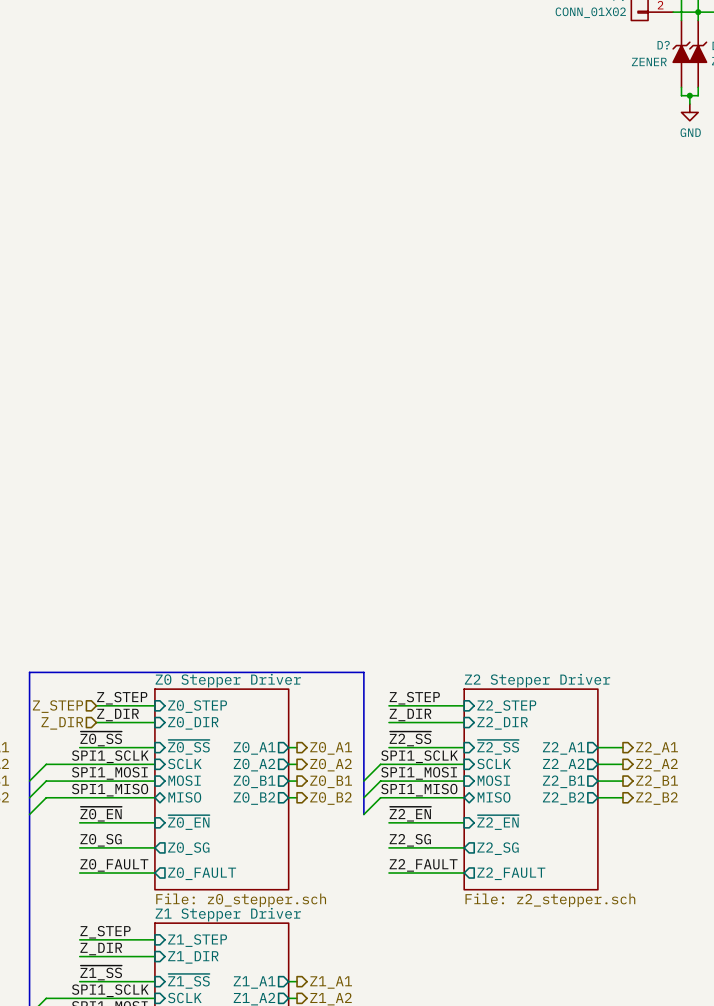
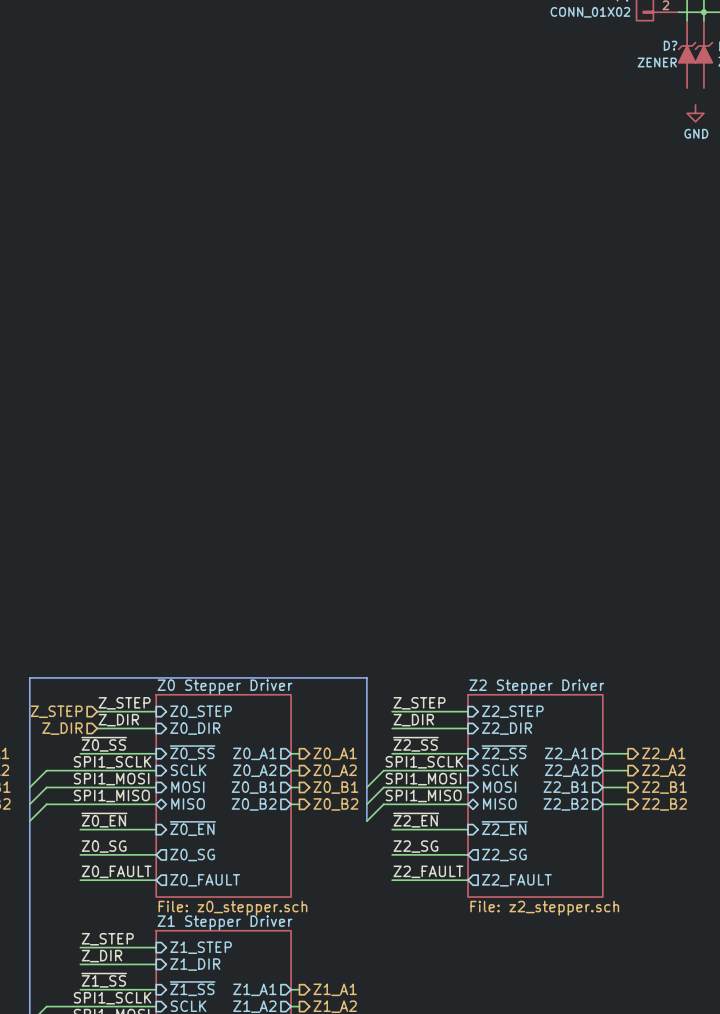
wire: (681, 87) (681, 95) (698, 95) (698, 87) -> none
wire: (689, 95) (689, 104) -> none
junction: (689, 95) -> none

